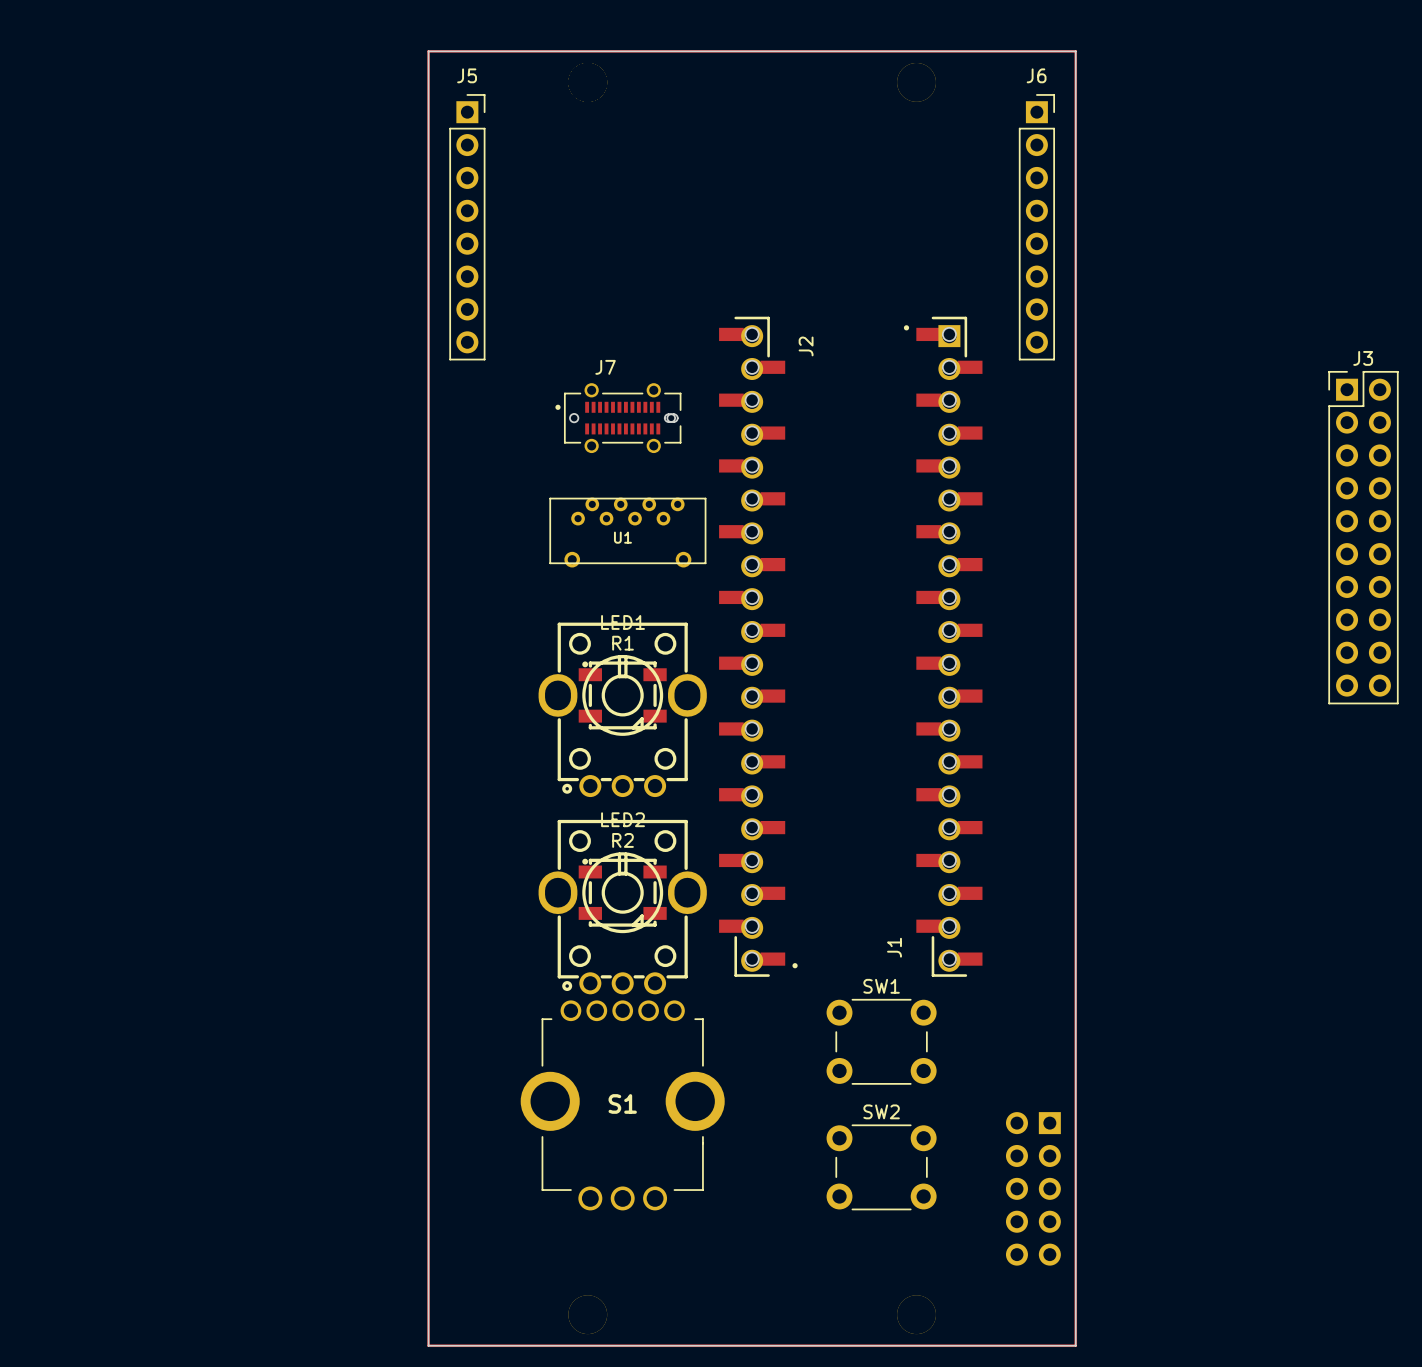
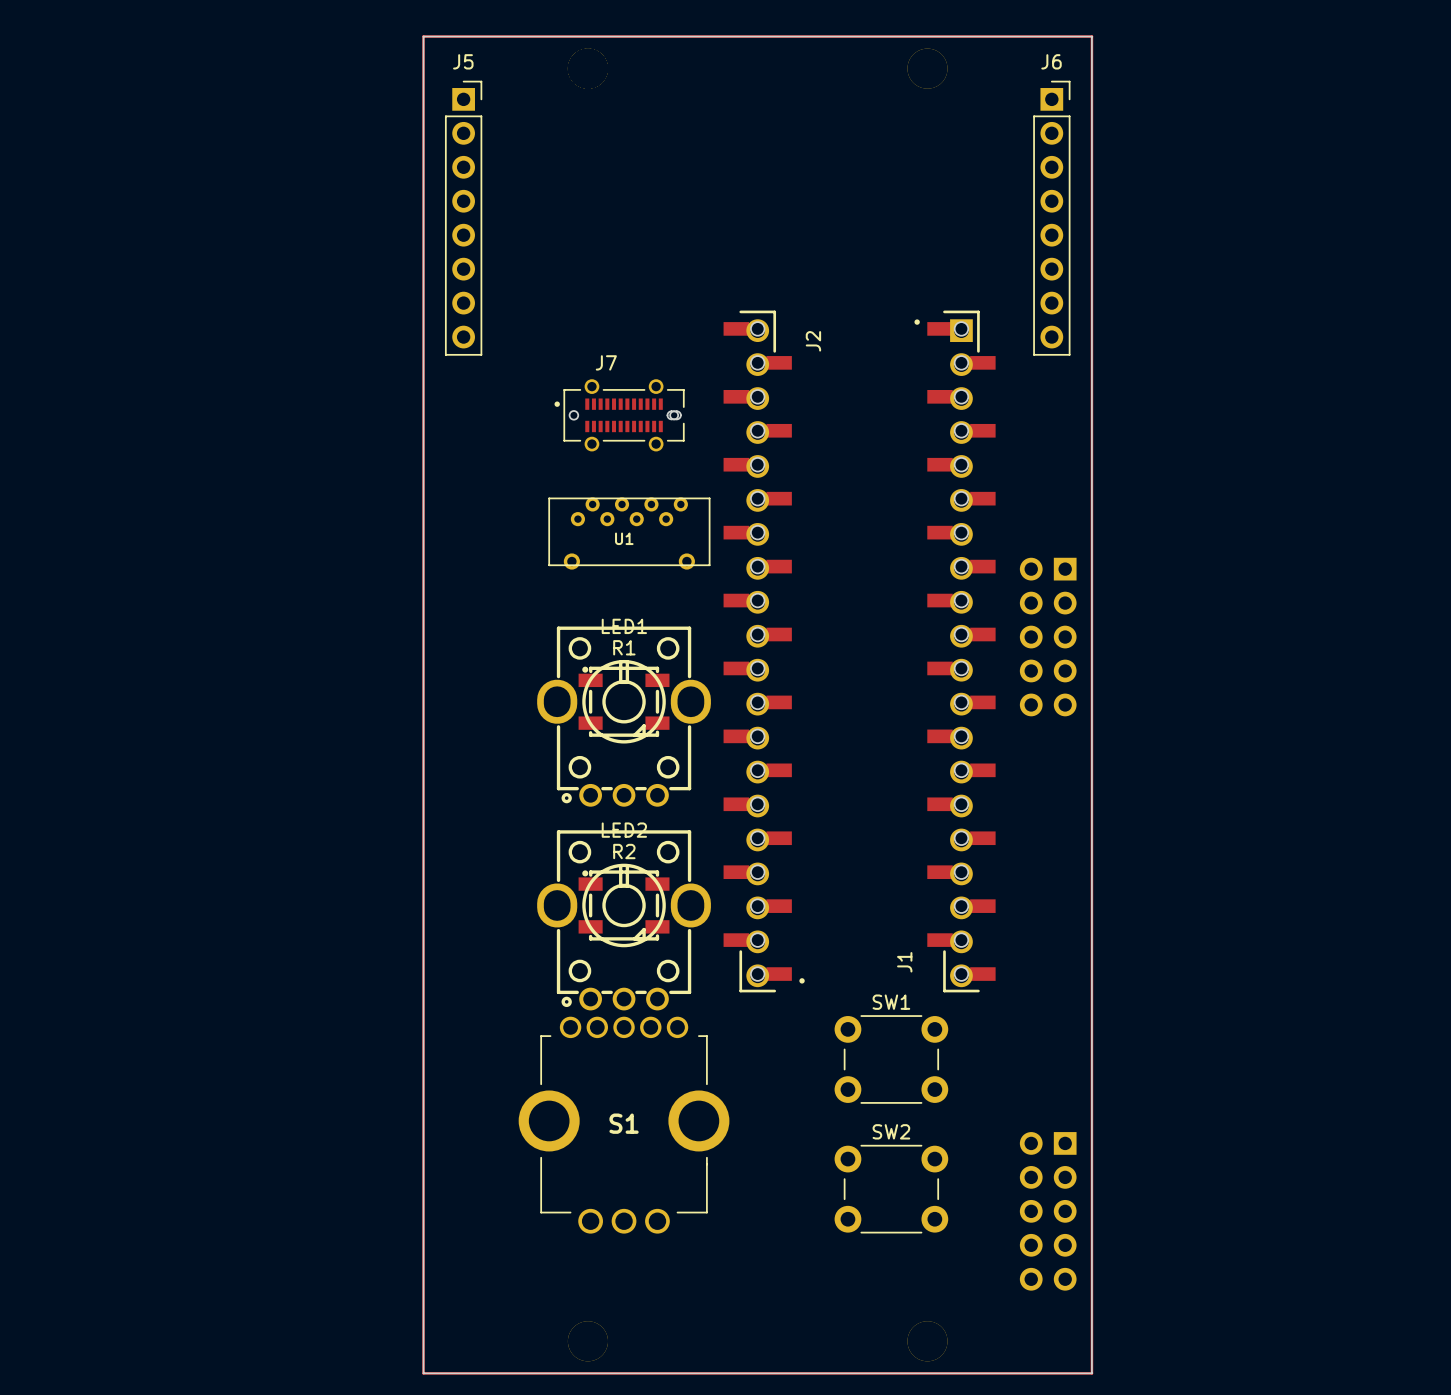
J3: (1363, 537) -> none
part: none -> (1048, 637)

